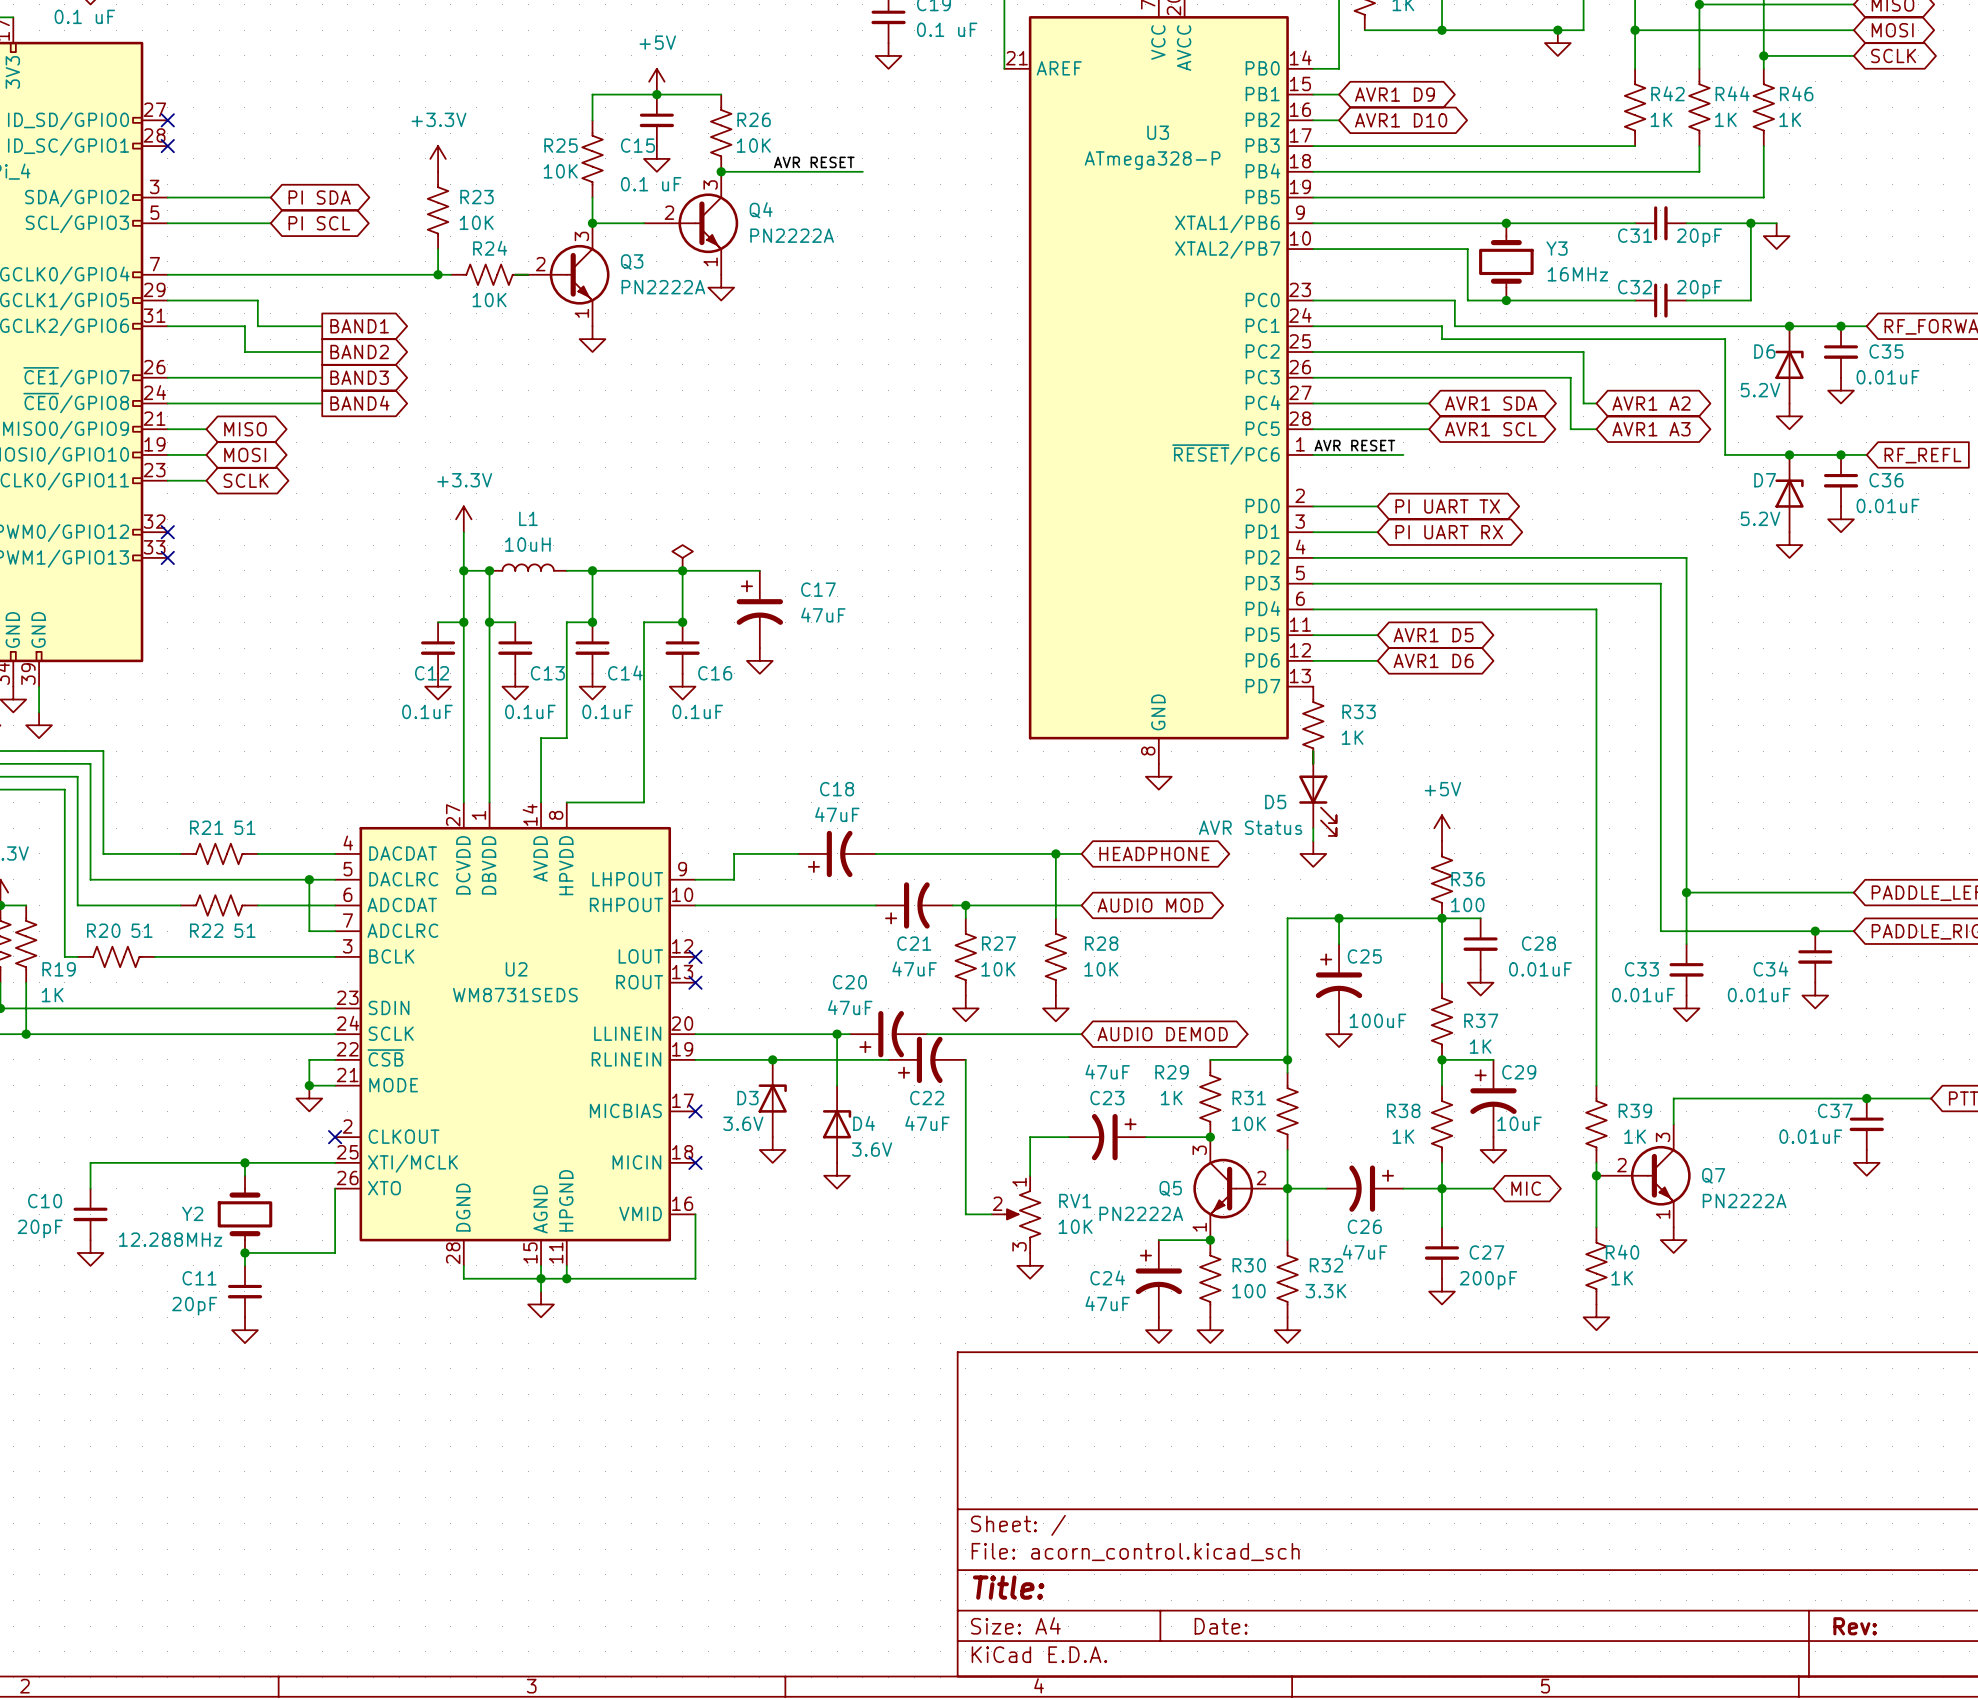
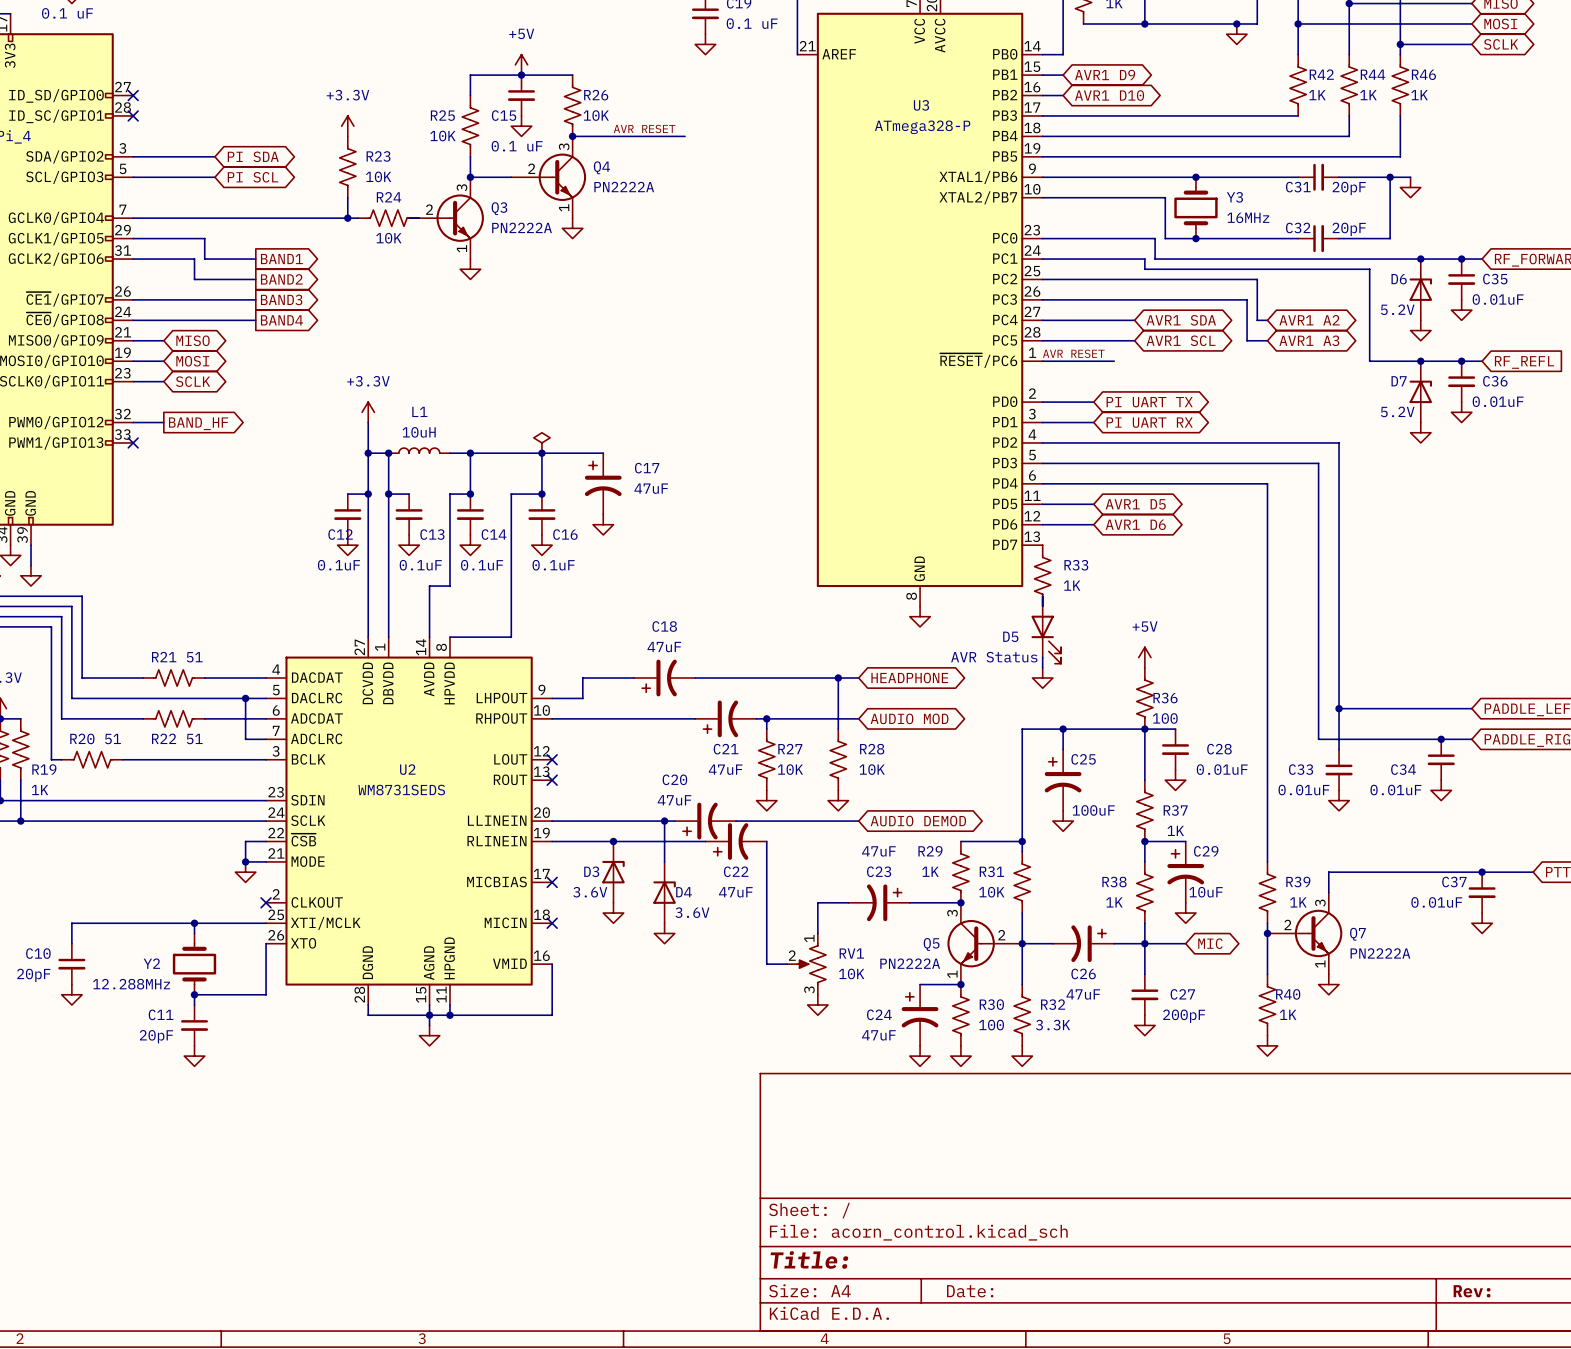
wire: none -> (133, 422) (163, 422)
no-connect mark: (167, 532) -> none
global label: none -> BAND_HF (198, 423)

